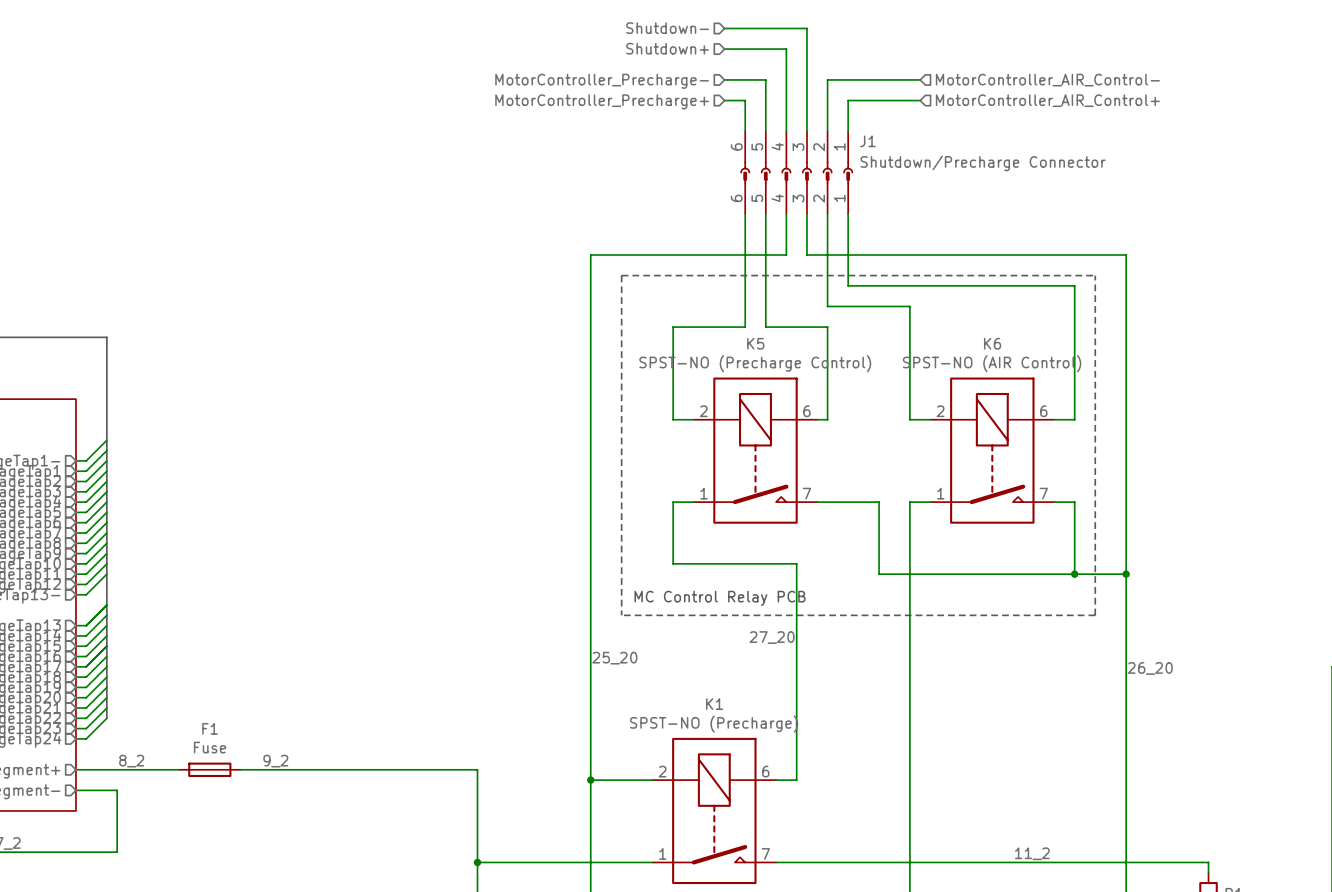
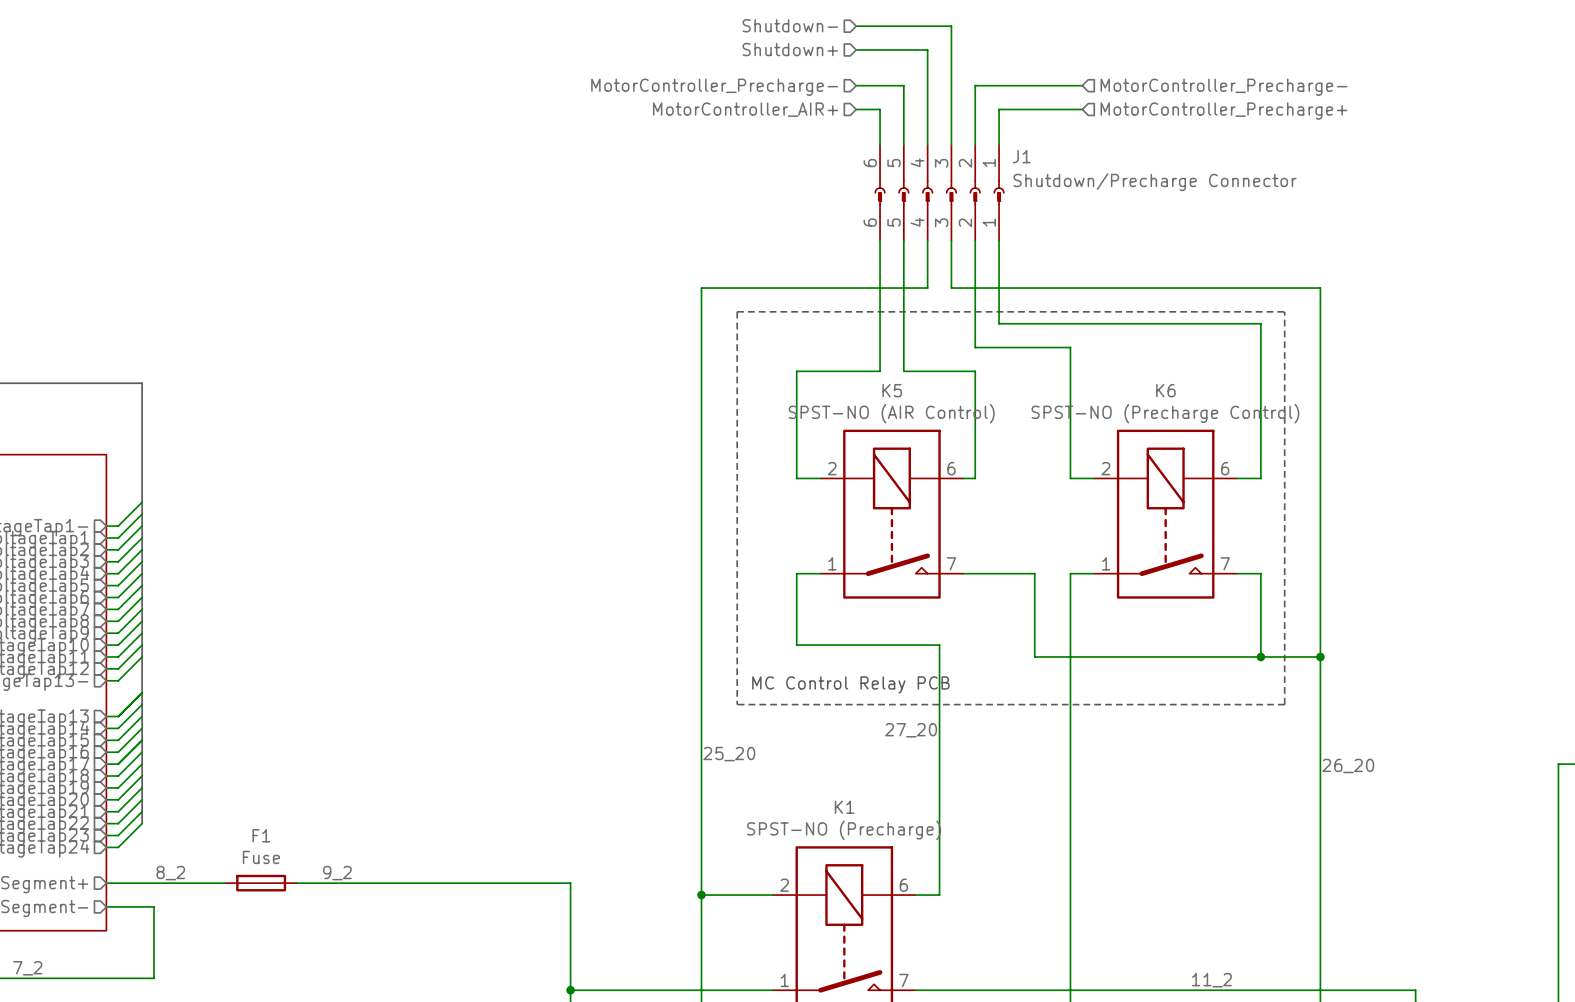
hierarchical label: MotorController_AIR_Control- (1047, 80) -> MotorController_Precharge- (1223, 87)
hierarchical label: MotorController_AIR_Control+ (1047, 100) -> MotorController_Precharge+ (1223, 111)
hierarchical label: MotorController_Precharge+ (602, 101) -> MotorController_AIR+ (745, 109)
K5 value: SPST-NO (Precharge Control) (755, 363) -> SPST-NO (AIR Control) (891, 413)
K6 value: SPST-NO (AIR Control) (992, 363) -> SPST-NO (Precharge Control) (1165, 413)

